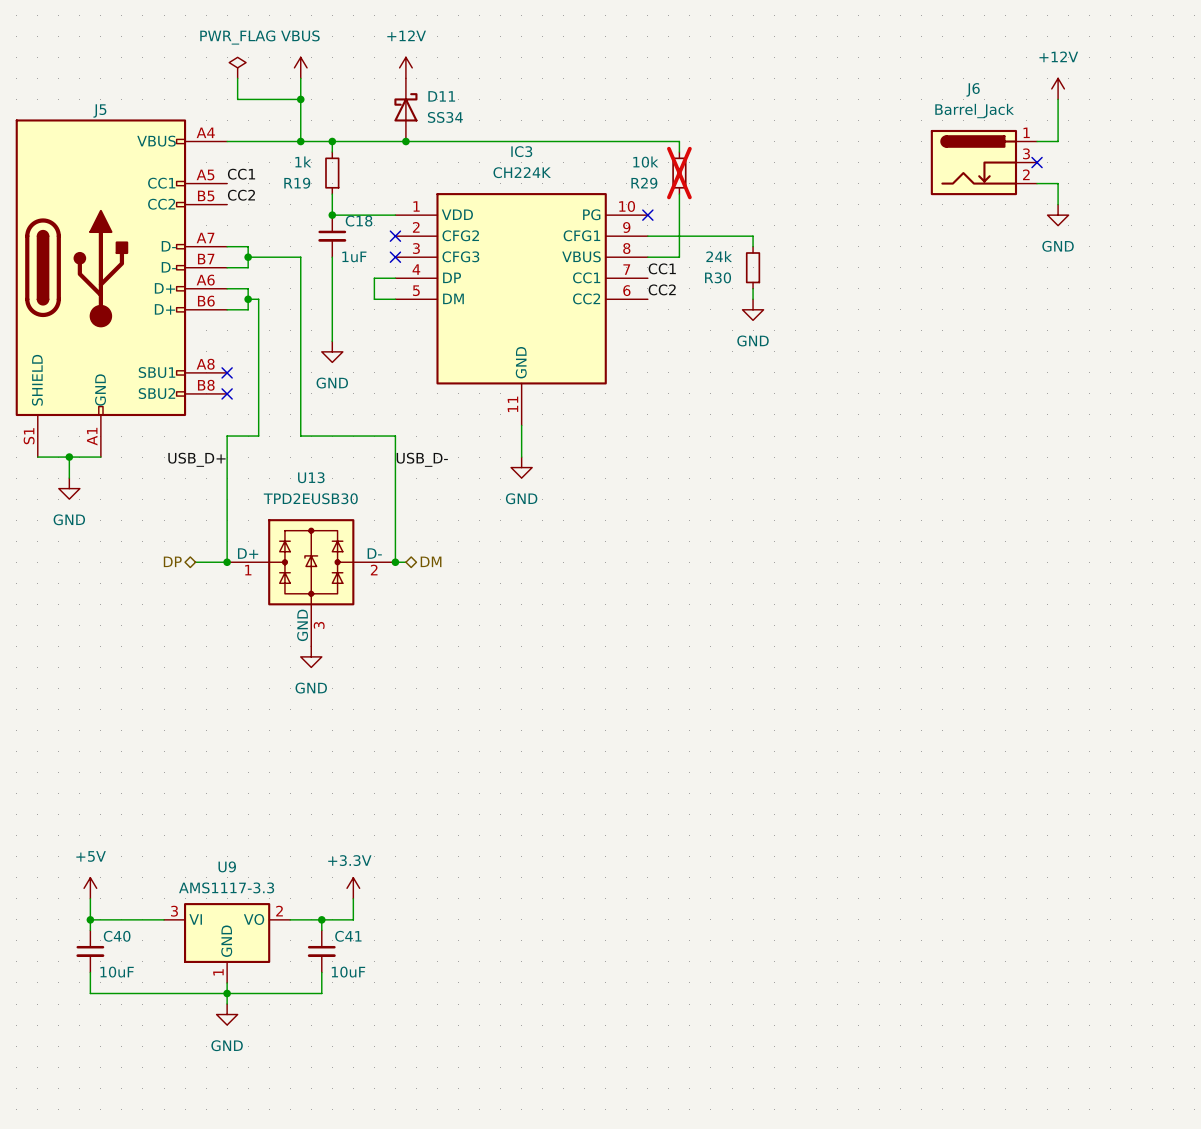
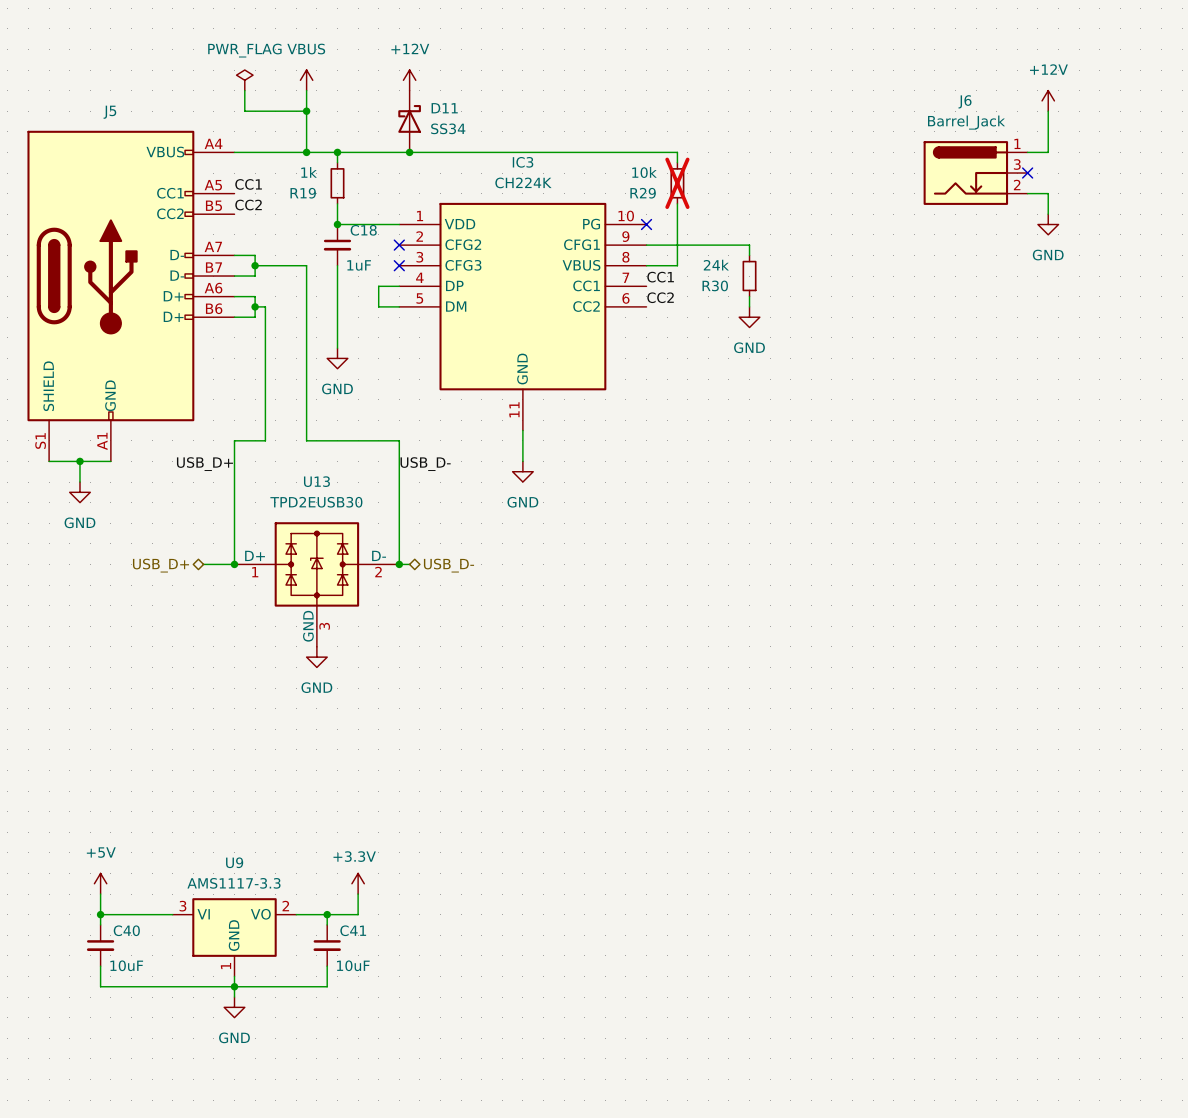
J5 symbol: [15, 119, 228, 458] -> [27, 130, 235, 462]
no-connect mark: (227, 372) -> none
no-connect mark: (227, 393) -> none
hierarchical label: DP (172, 561) -> USB_D+ (160, 565)
hierarchical label: DM (431, 561) -> USB_D- (448, 565)

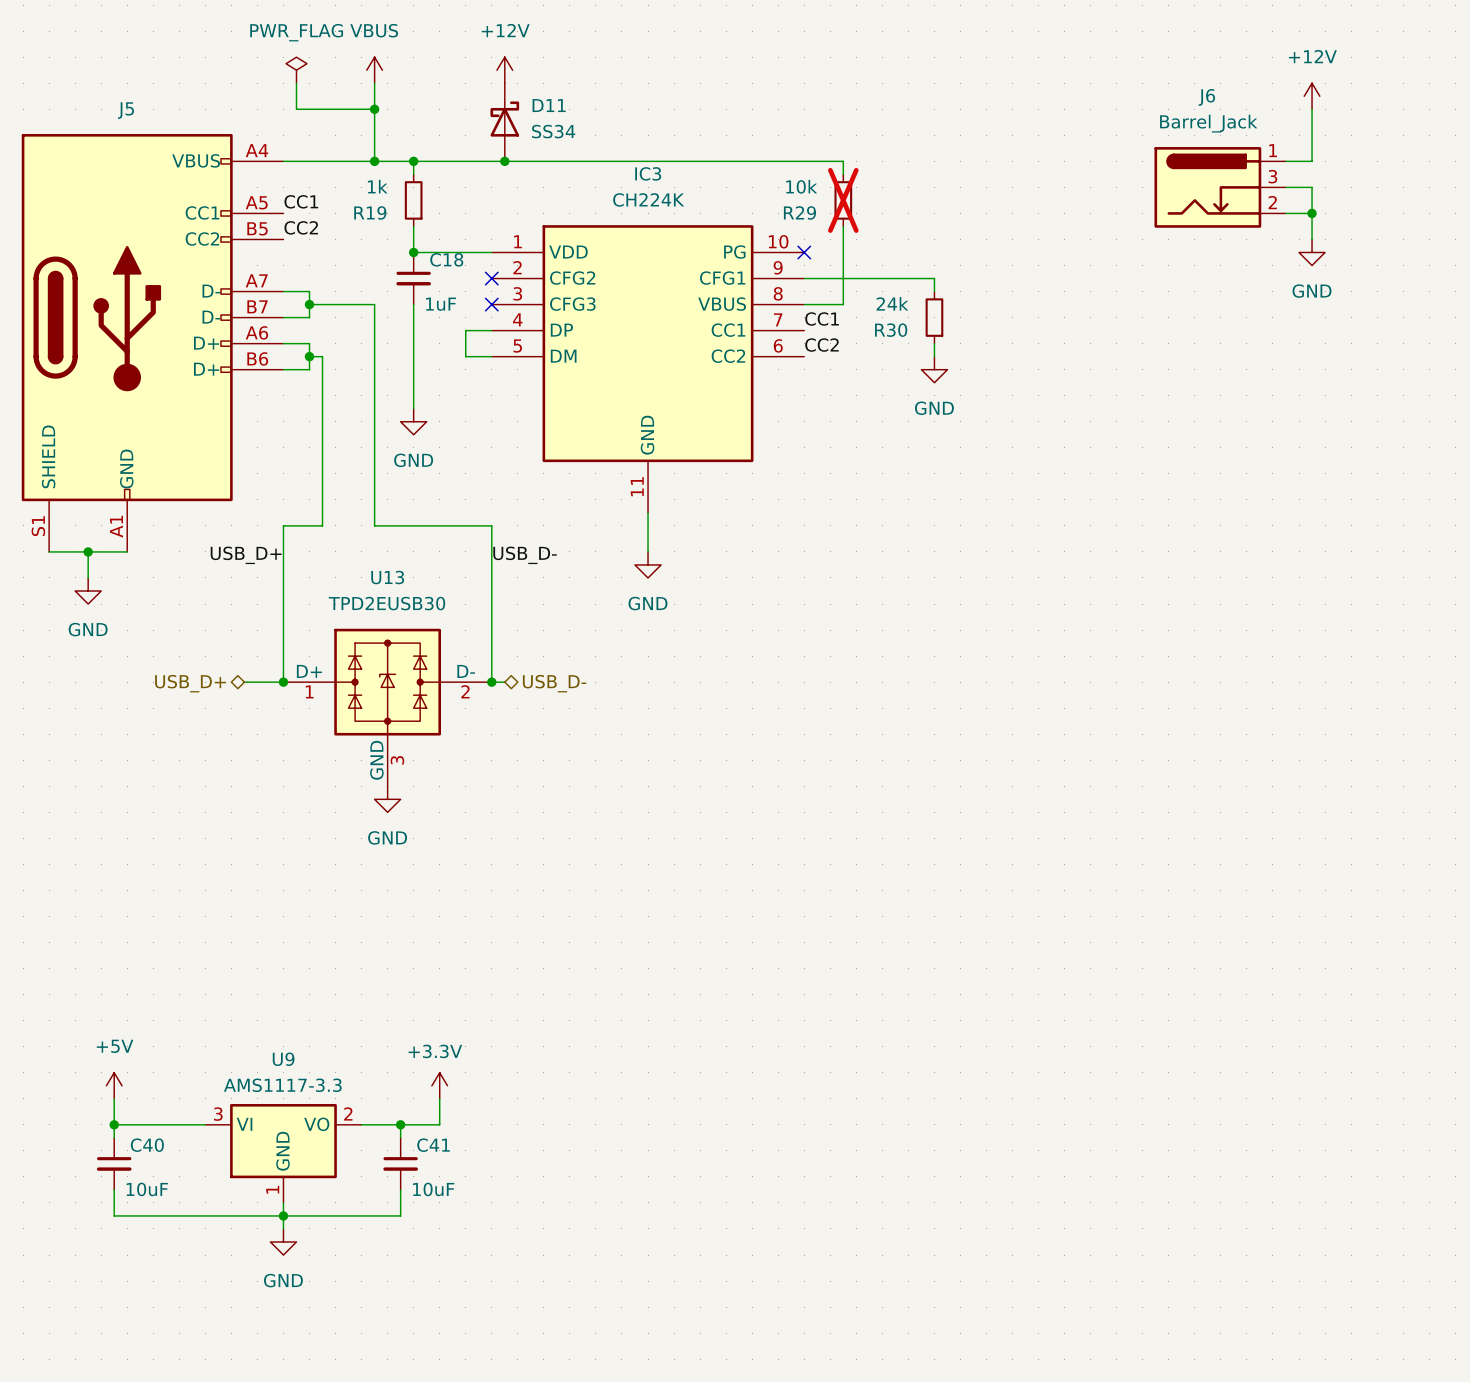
wire: none -> (1285, 187) (1312, 187) (1312, 213)
no-connect mark: (1027, 173) -> none
junction: none -> (1312, 213)

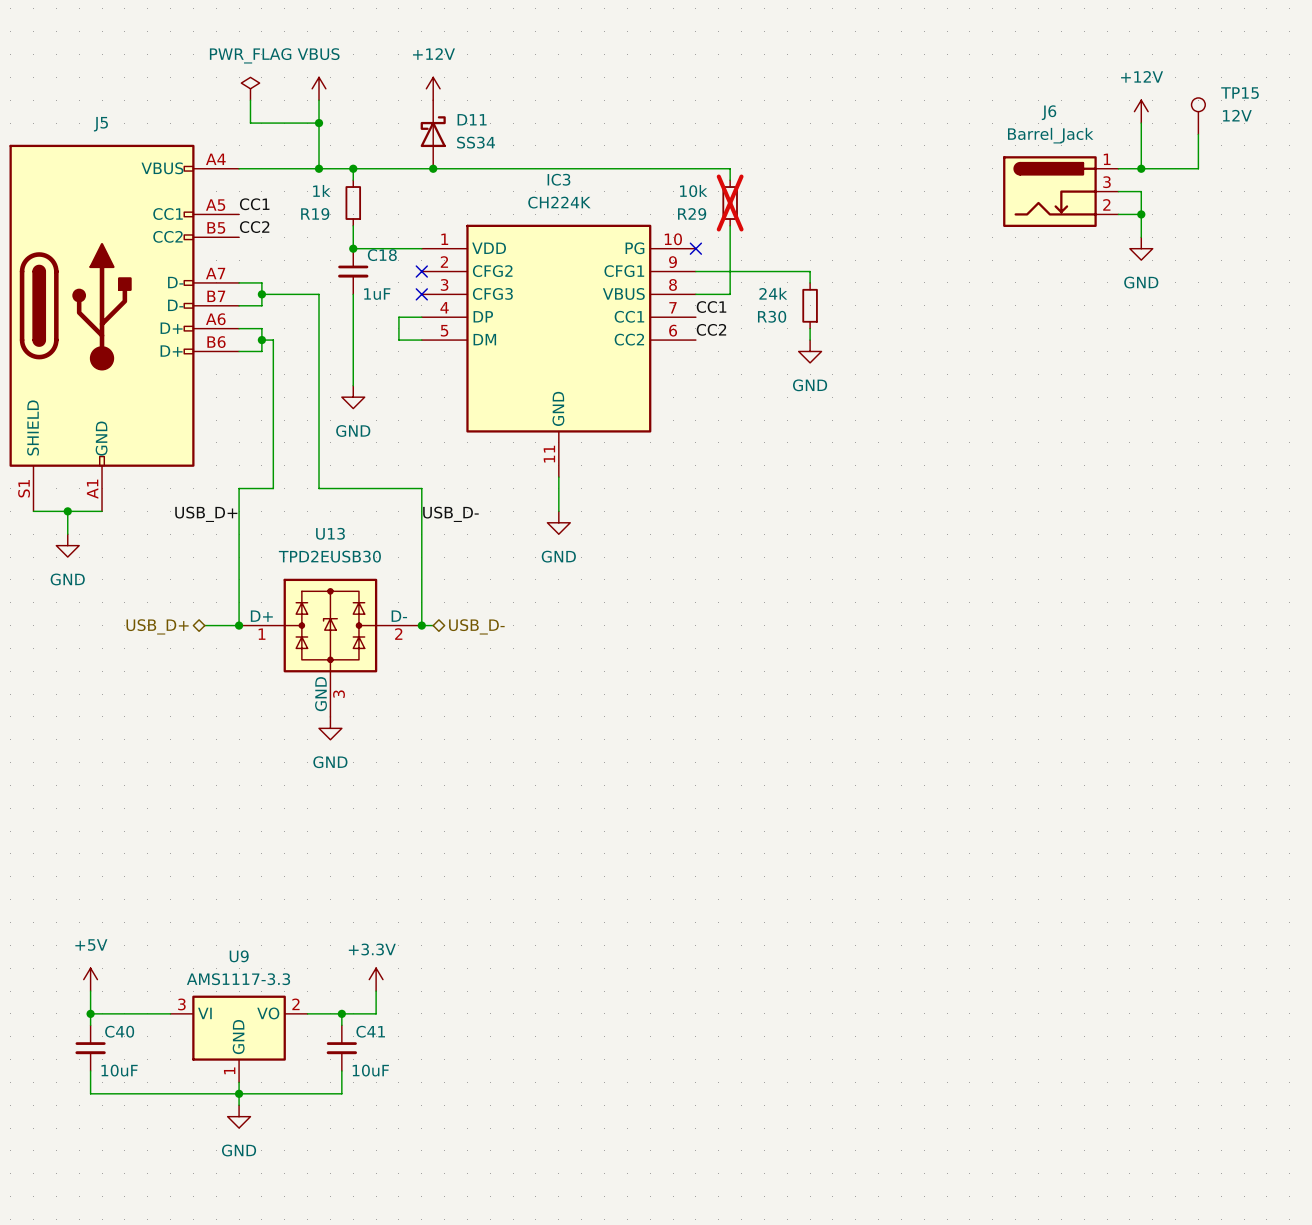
TP15: none -> 12V (1198, 116)
wire: none -> (1198, 134) (1198, 168) (1141, 168)
junction: none -> (1141, 168)

